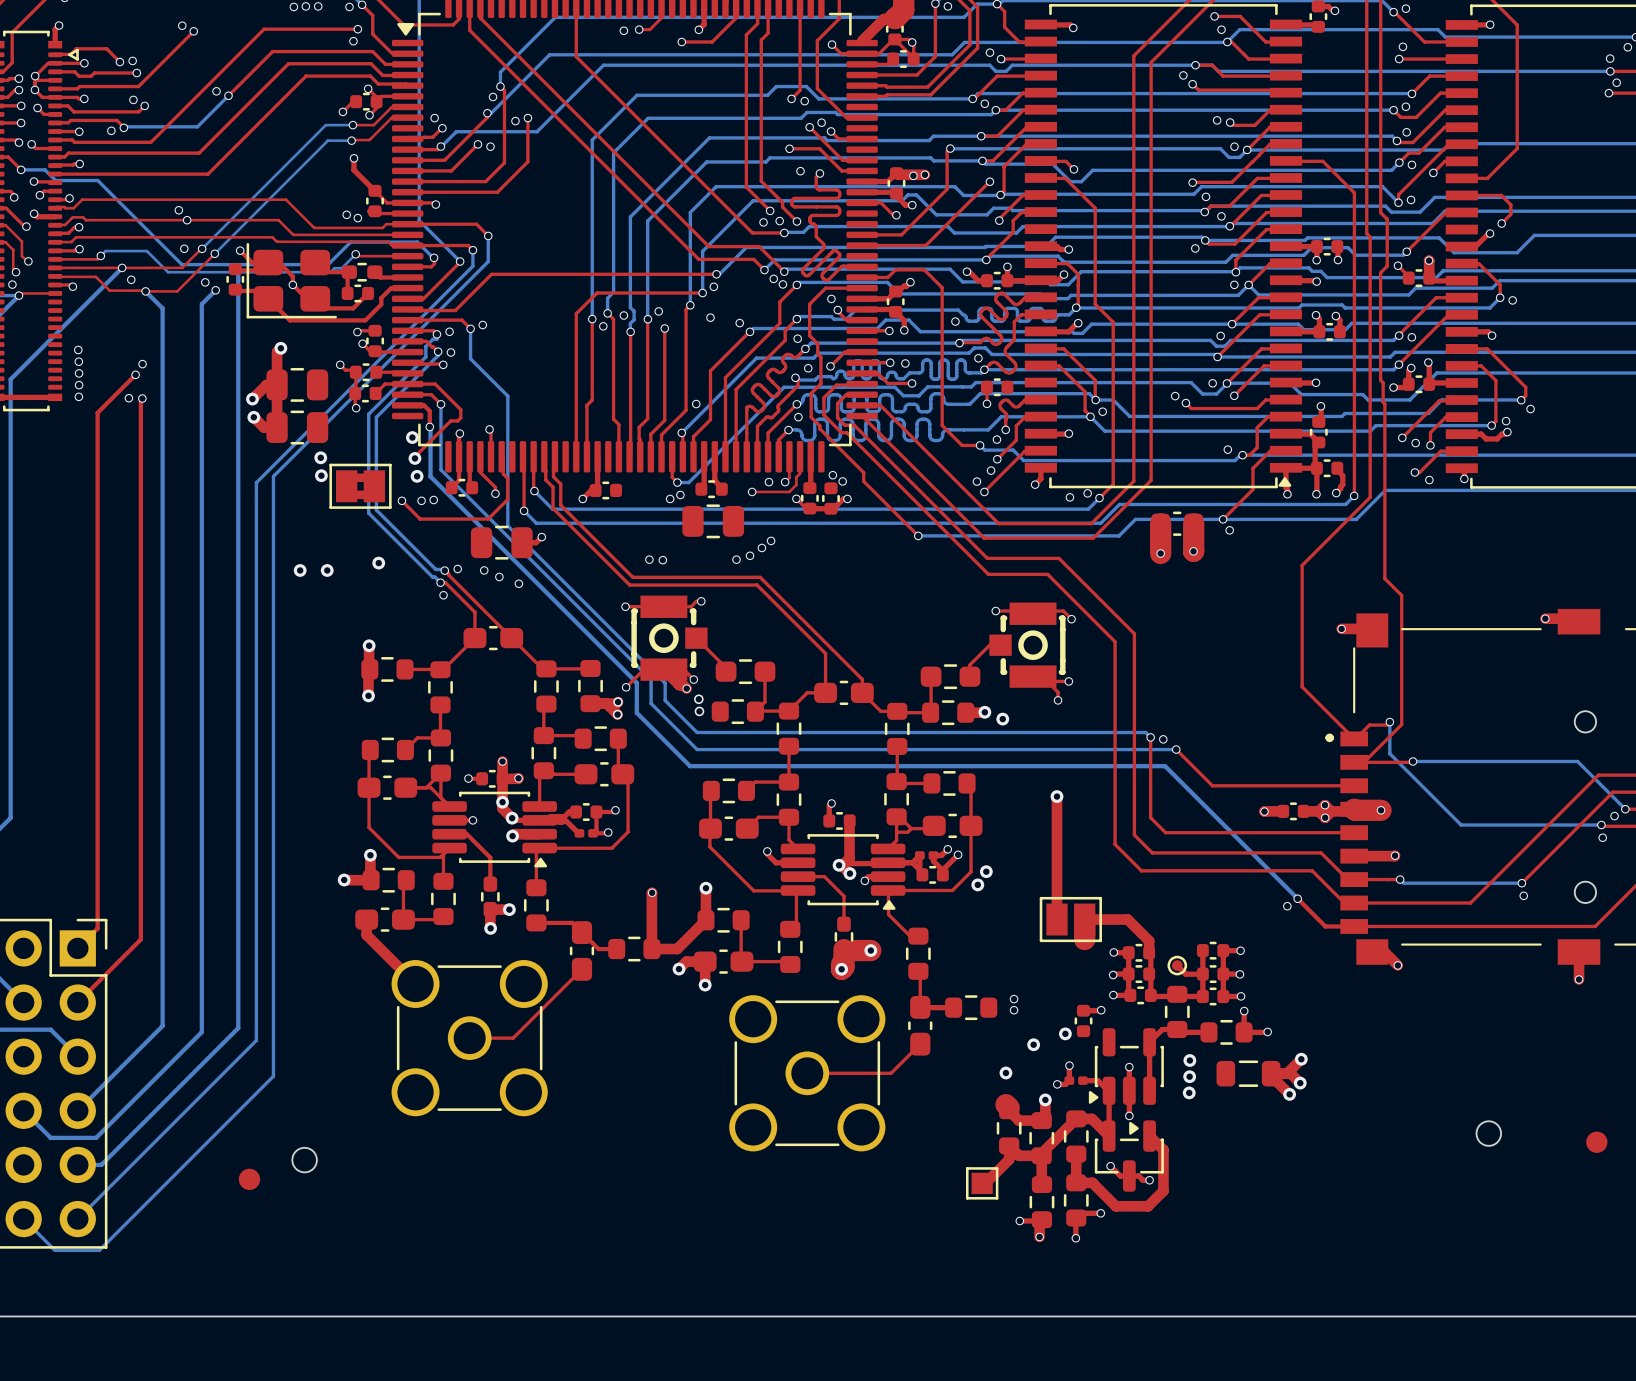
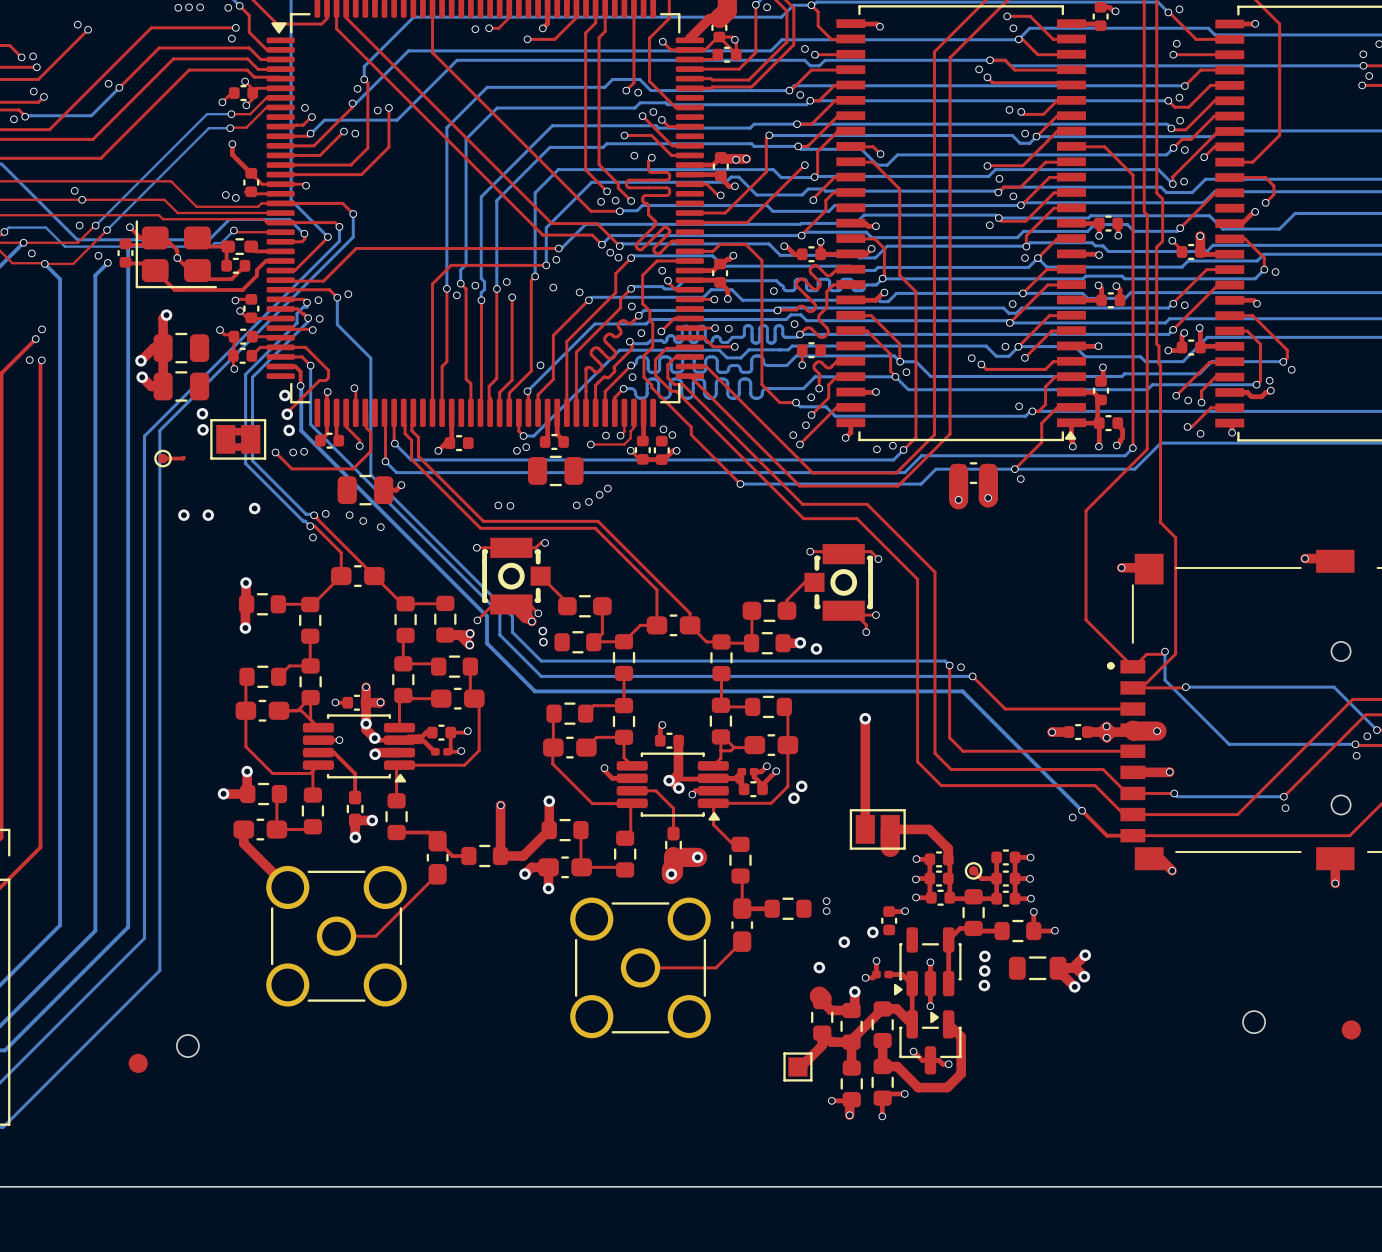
top track: none -> (183, 457) (163, 458)
part: none -> (163, 458)

